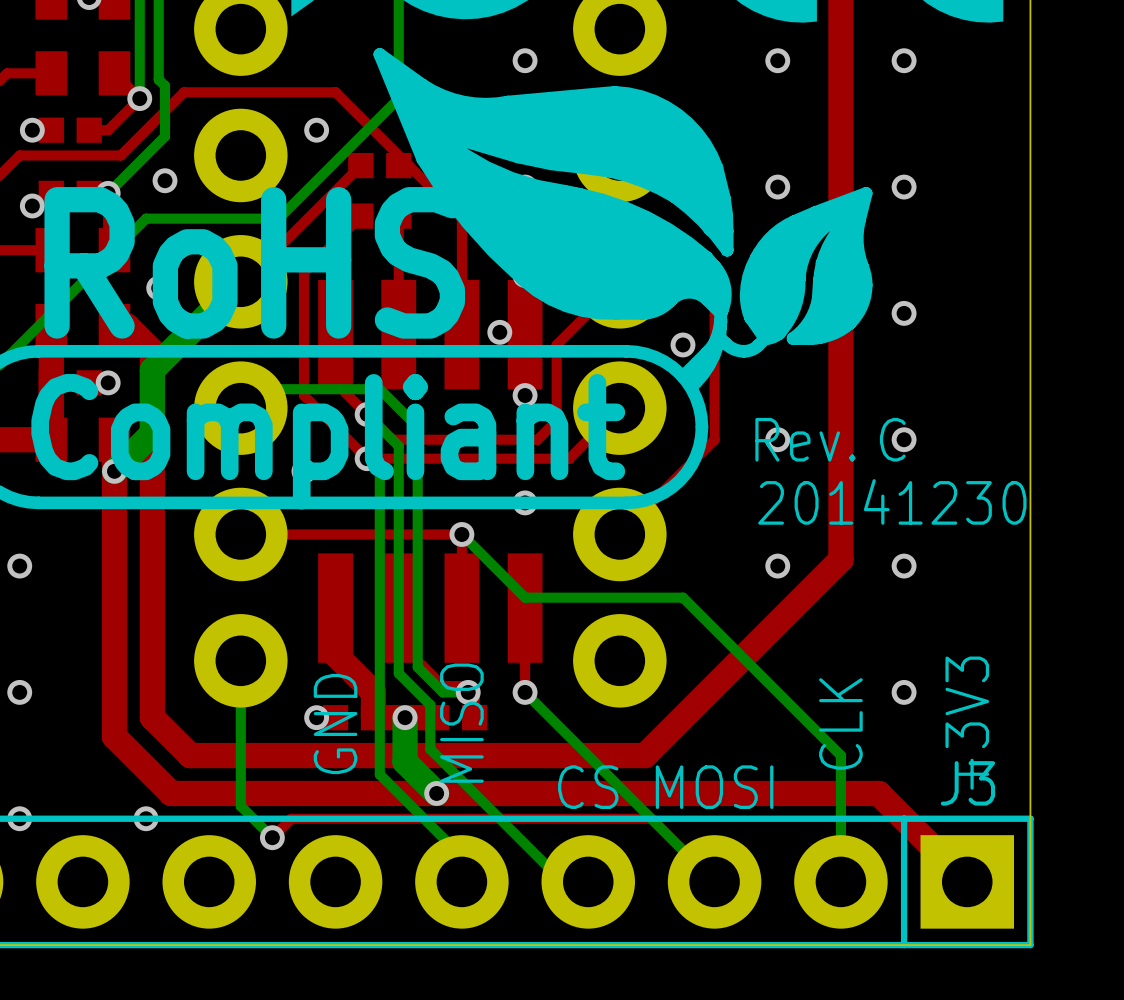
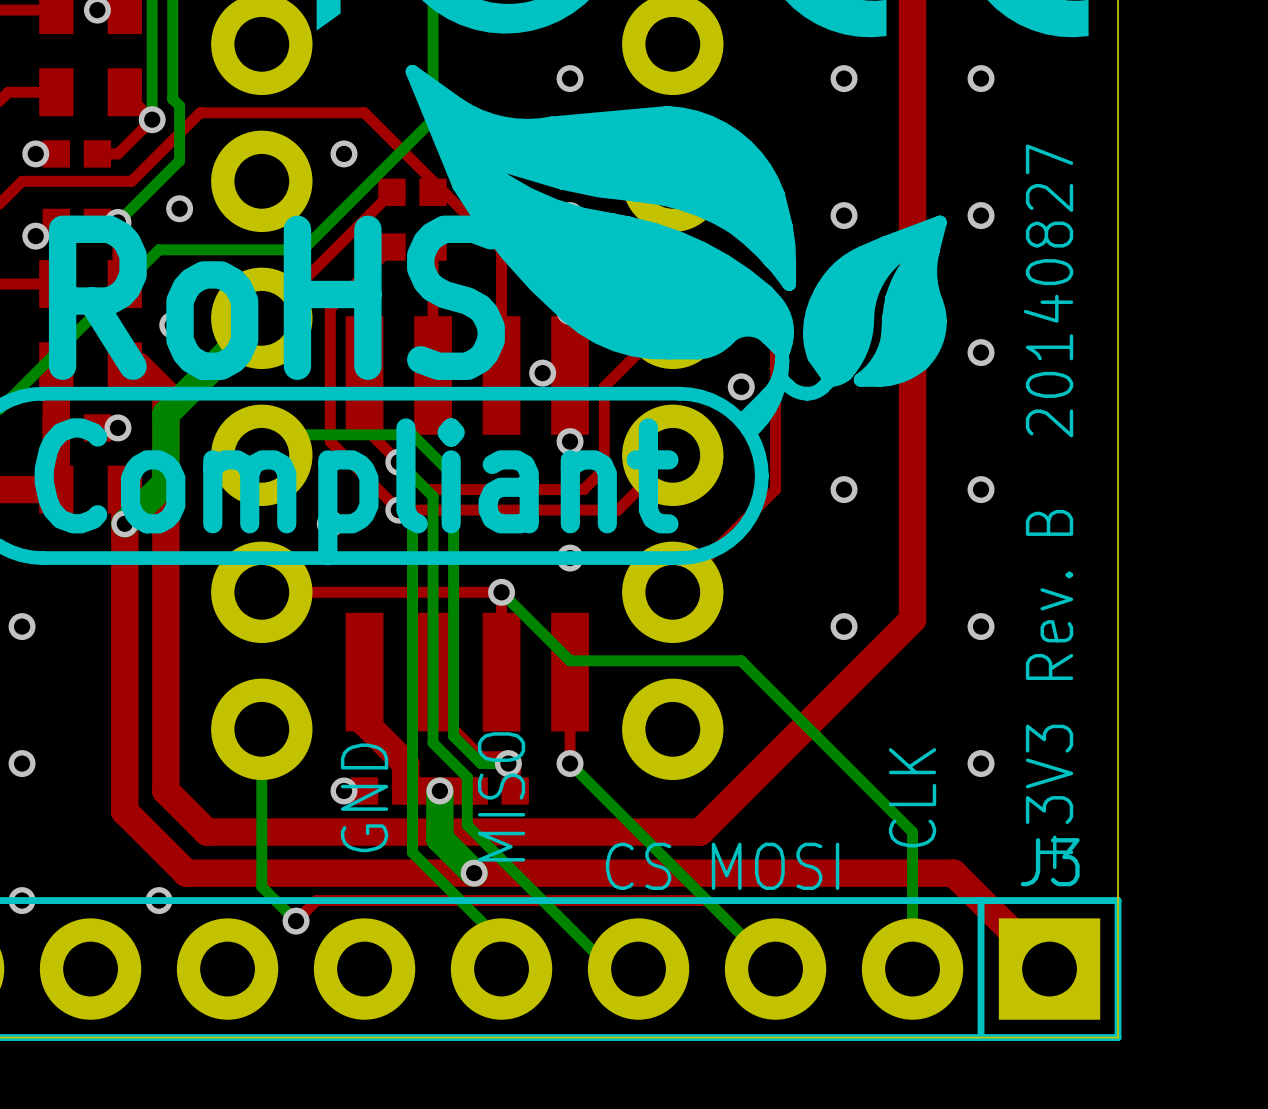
text: none -> 20140827 (1048, 290)
text rotation: 0° (805, 439) -> 90° counterclockwise (1049, 625)
text position: Rev. (805, 439) -> Rev. (1049, 625)
text: C (892, 439) -> none
text: none -> B (1049, 522)
text: 20141230 (892, 501) -> none

